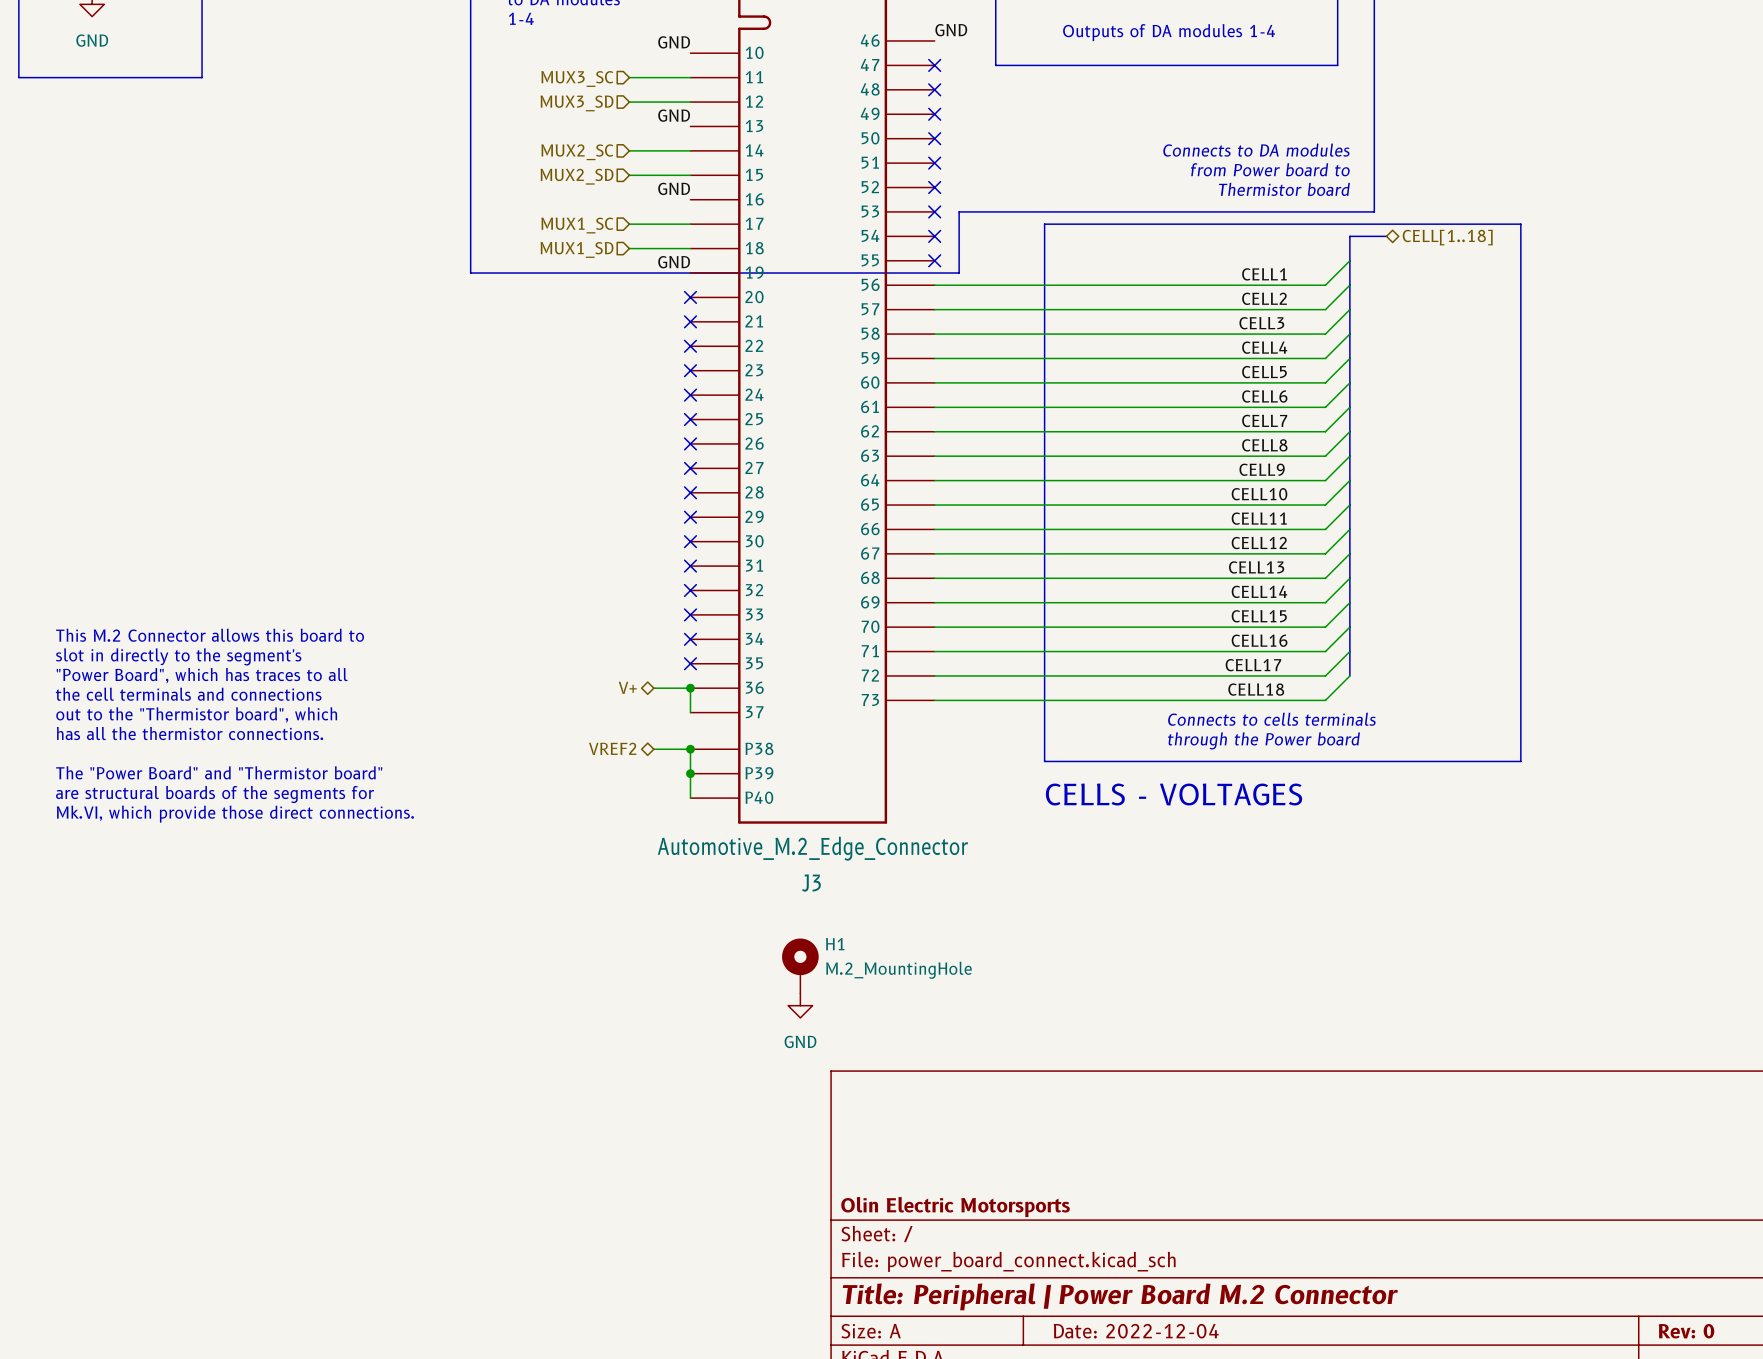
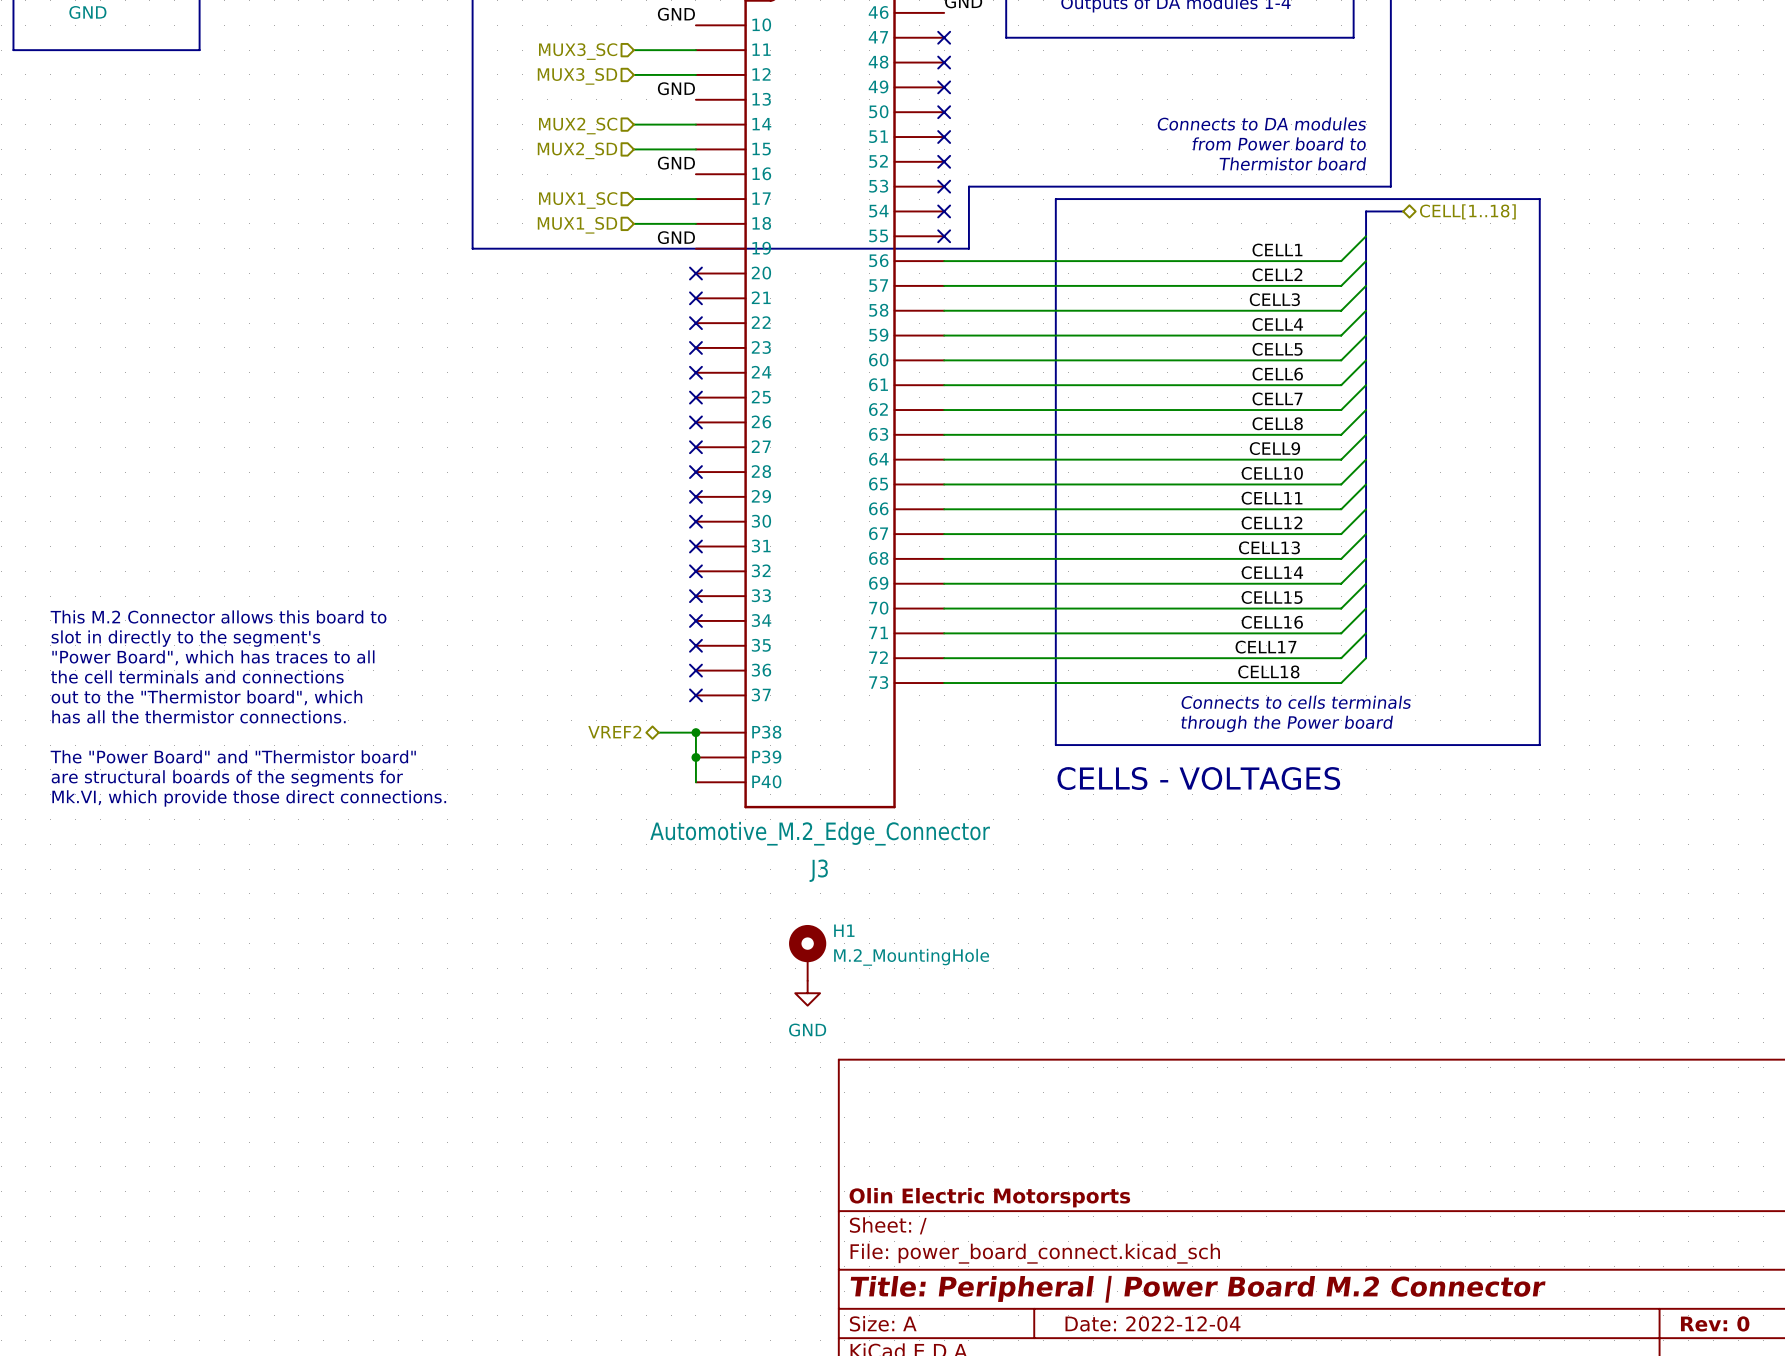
hierarchical label: V+ (627, 687) -> none
wire: (653, 688) (690, 688) (690, 712) -> none
junction: (690, 688) -> none
no-connect mark: none -> (695, 670)
no-connect mark: none -> (695, 695)

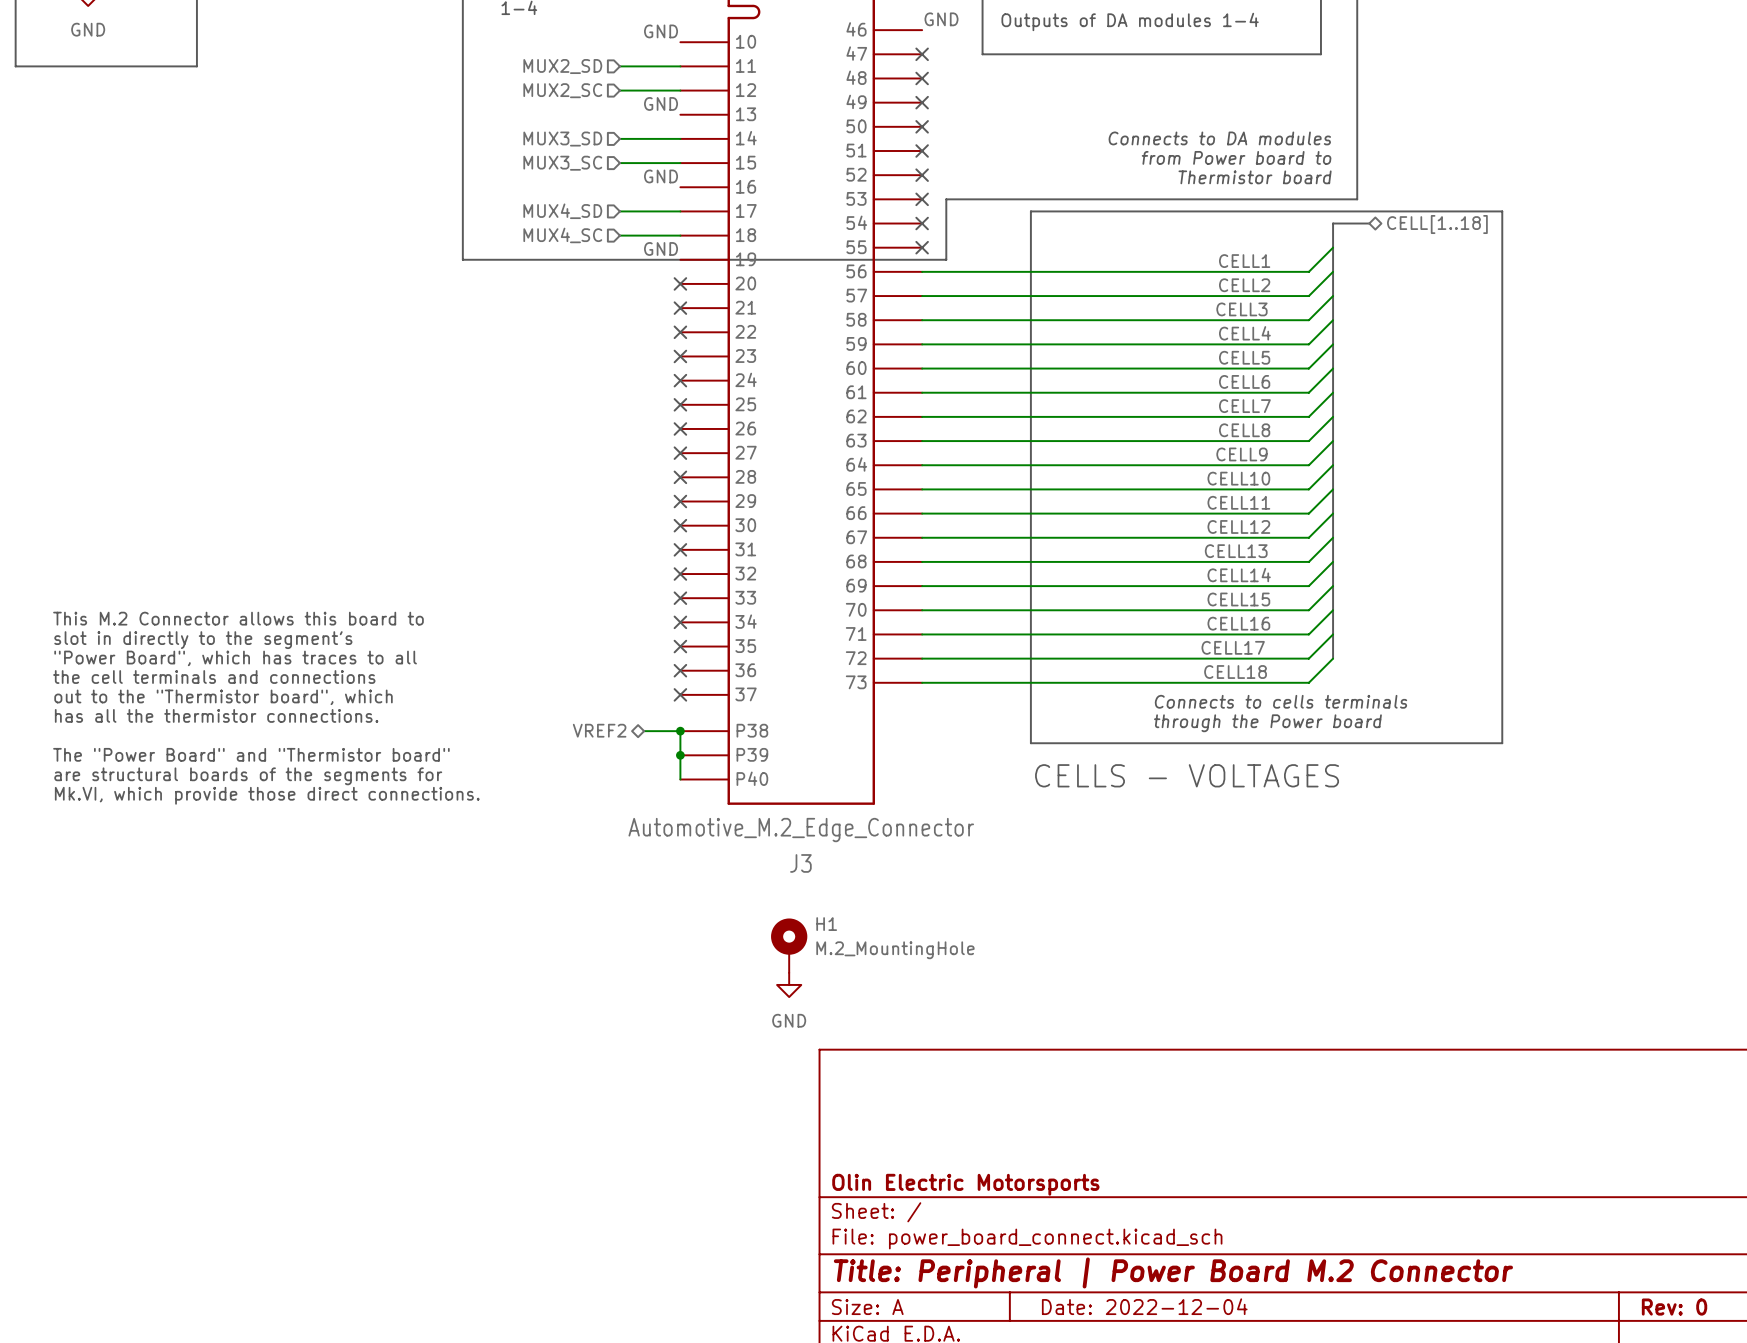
hierarchical label: MUX3_SC (578, 51) -> MUX2_SD (562, 66)
hierarchical label: MUX3_SD (577, 76) -> MUX2_SC (562, 90)
hierarchical label: MUX2_SC (578, 126) -> MUX3_SD (562, 139)
hierarchical label: MUX2_SD (577, 150) -> MUX3_SC (562, 163)
hierarchical label: MUX1_SC (578, 200) -> MUX4_SD (562, 211)
hierarchical label: MUX1_SD (577, 225) -> MUX4_SC (562, 235)

